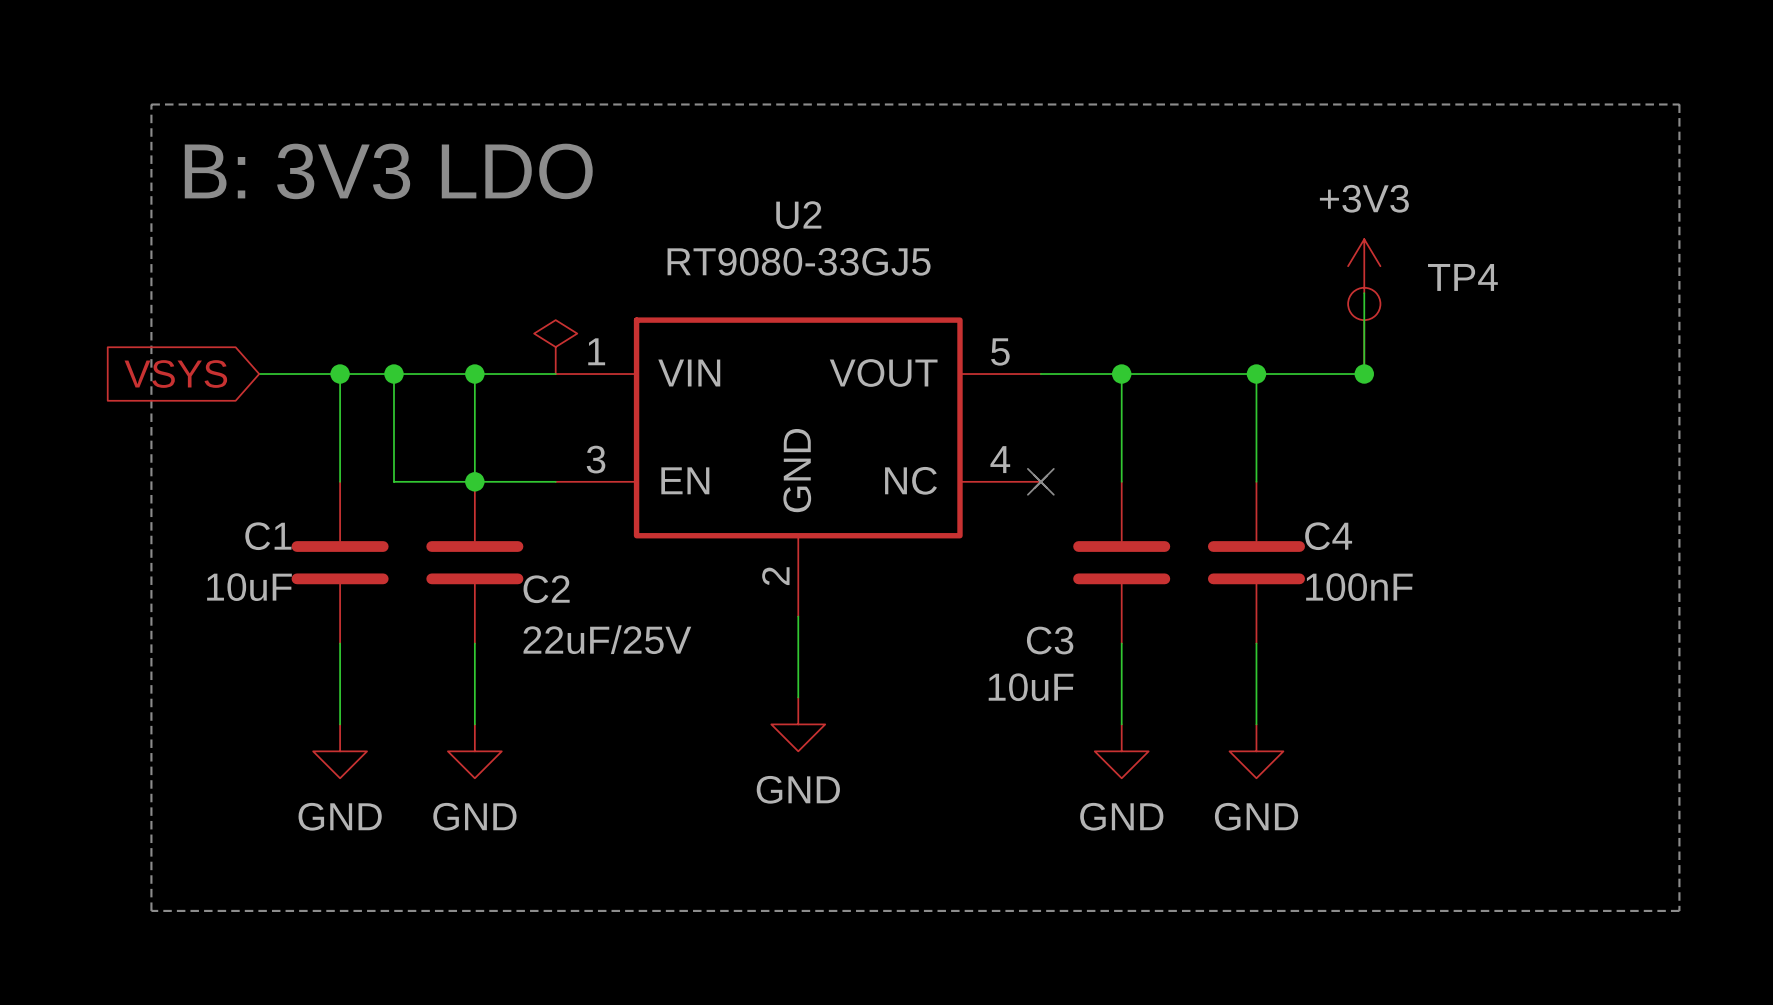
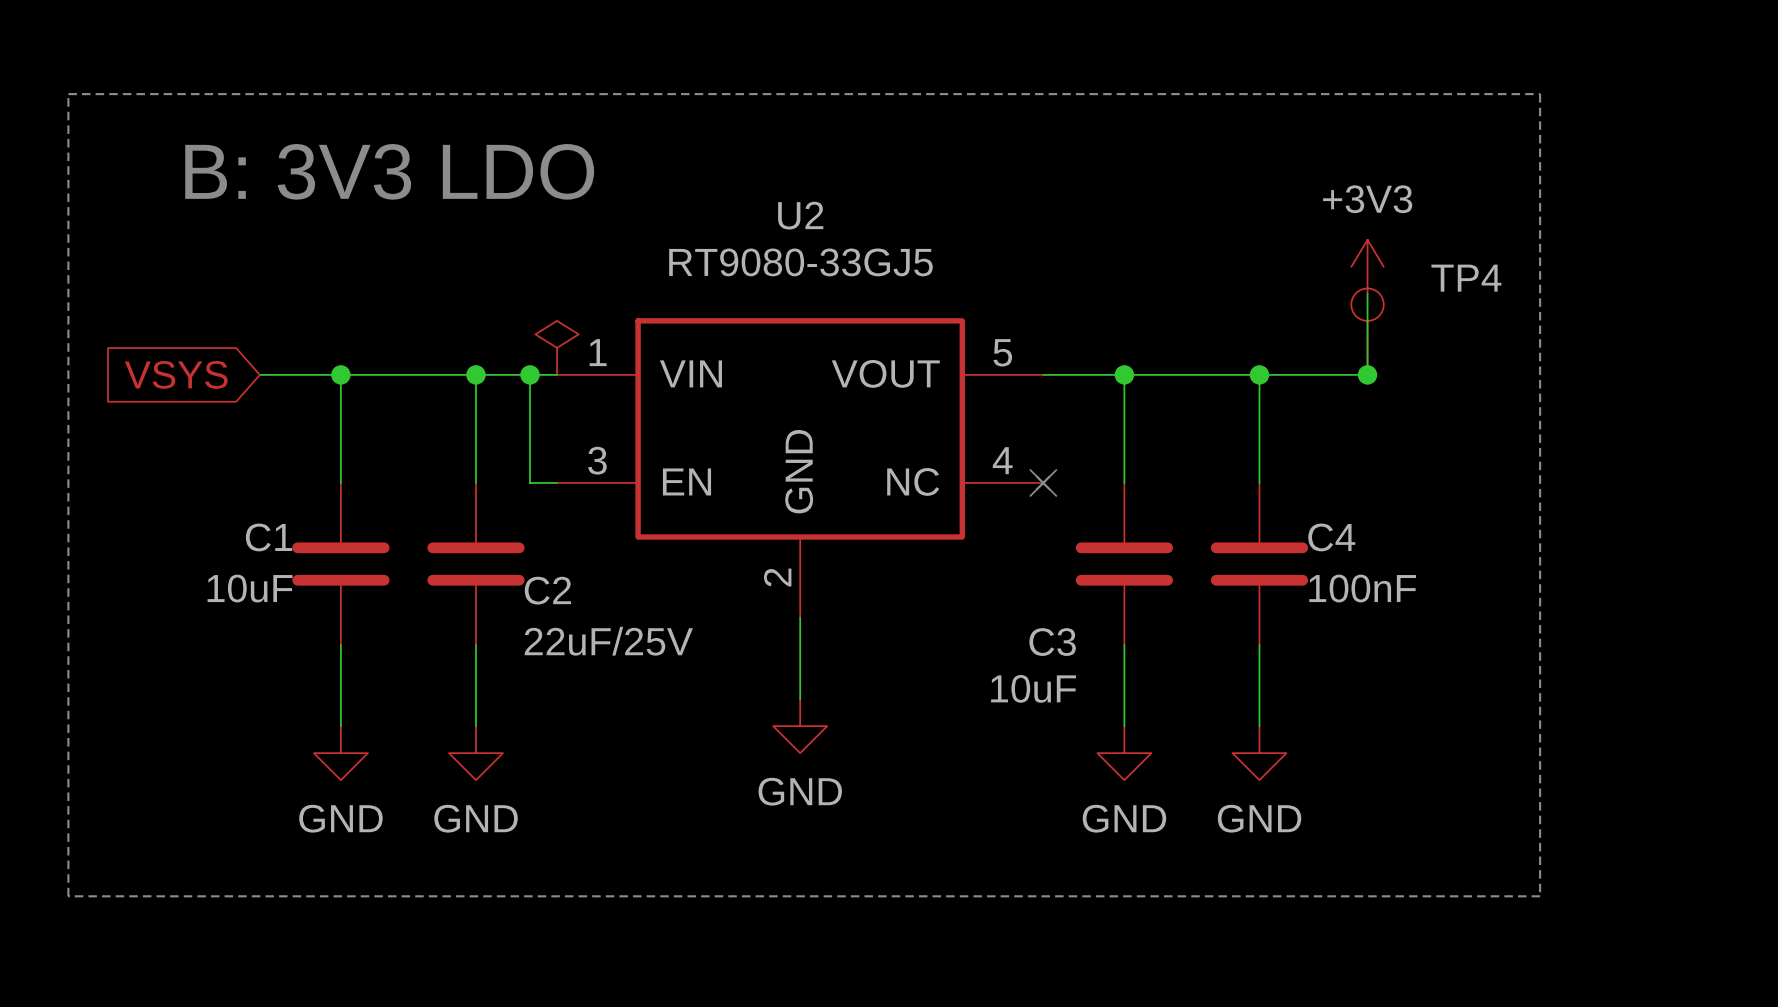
line: (151, 104) (1679, 104) (1679, 910) (151, 910) (151, 104) -> (68, 94) (68, 896) (1540, 896) (1540, 94) (68, 94)
wire: (393, 374) (393, 481) (528, 481) -> (530, 374) (530, 482)
junction: (393, 374) -> none
junction: none -> (530, 374)
junction: (474, 481) -> none

